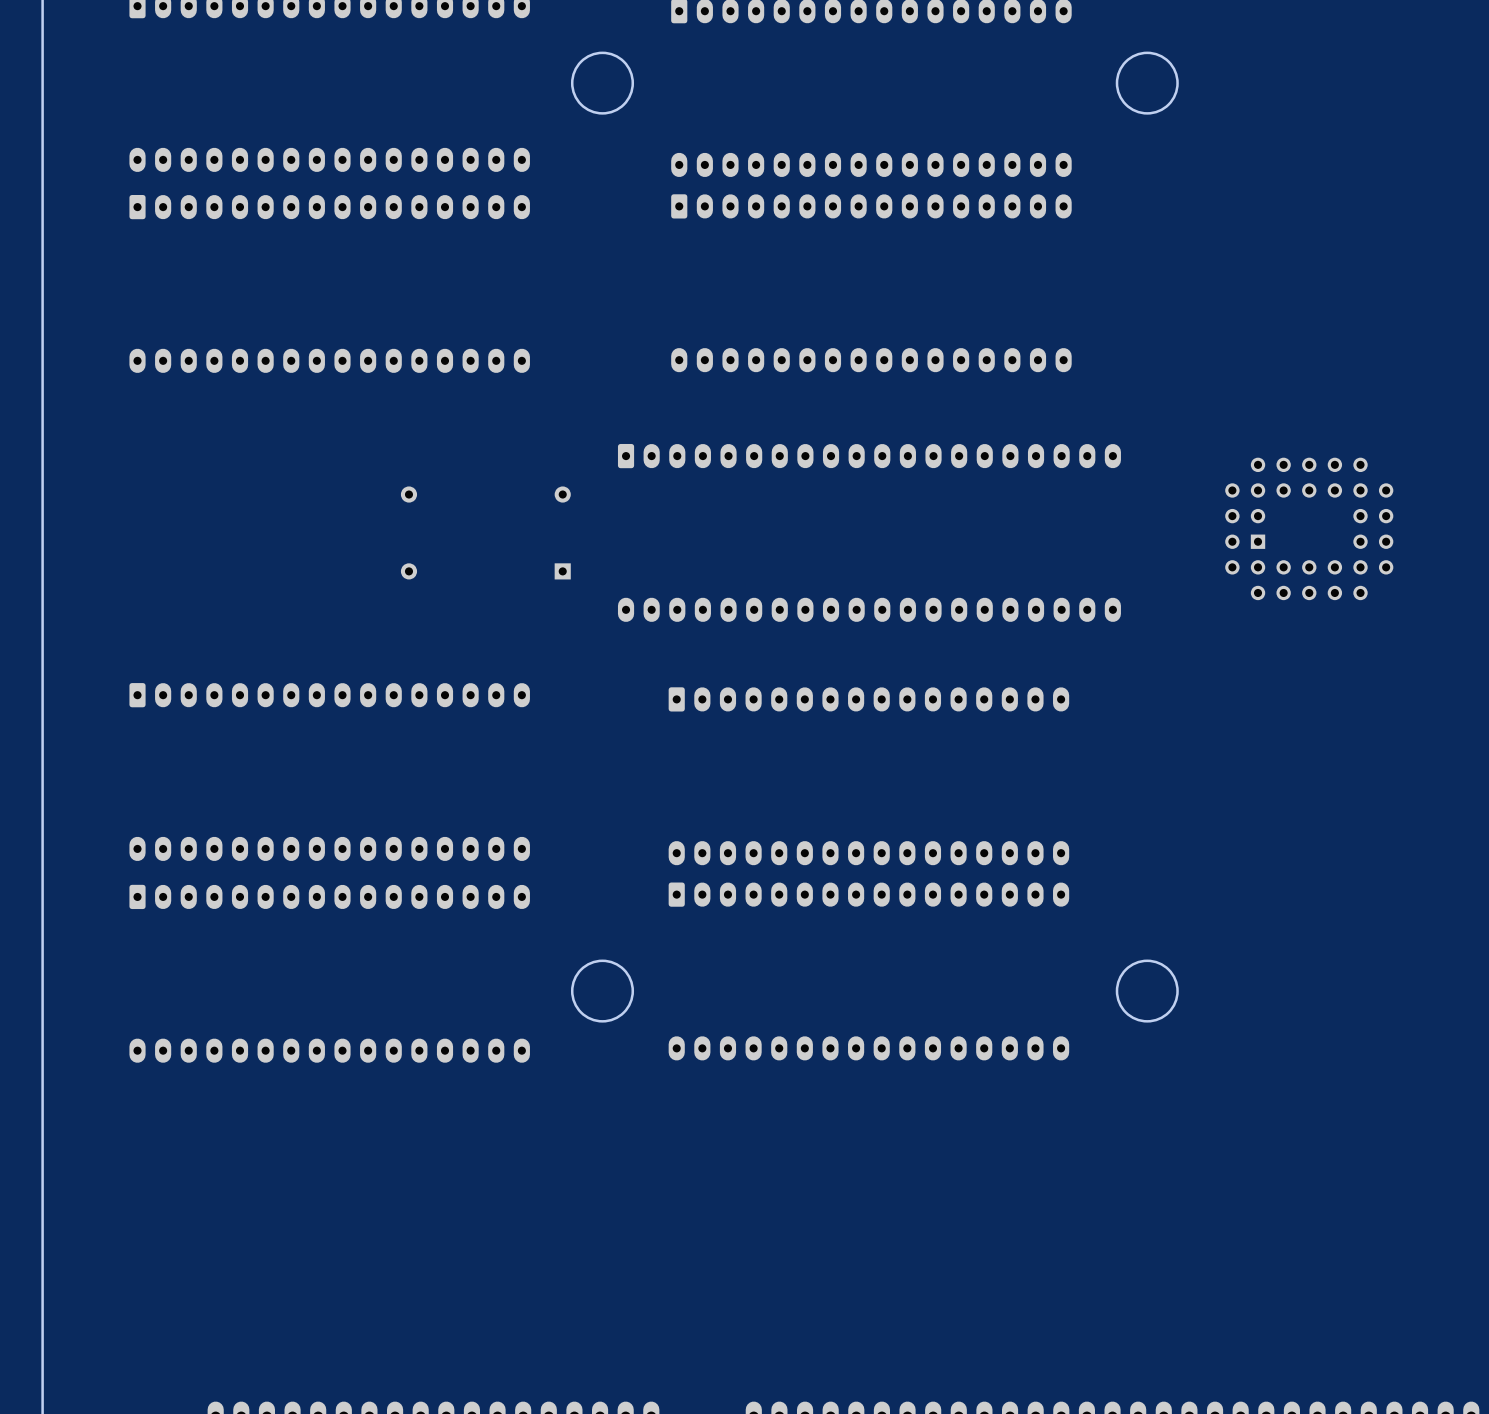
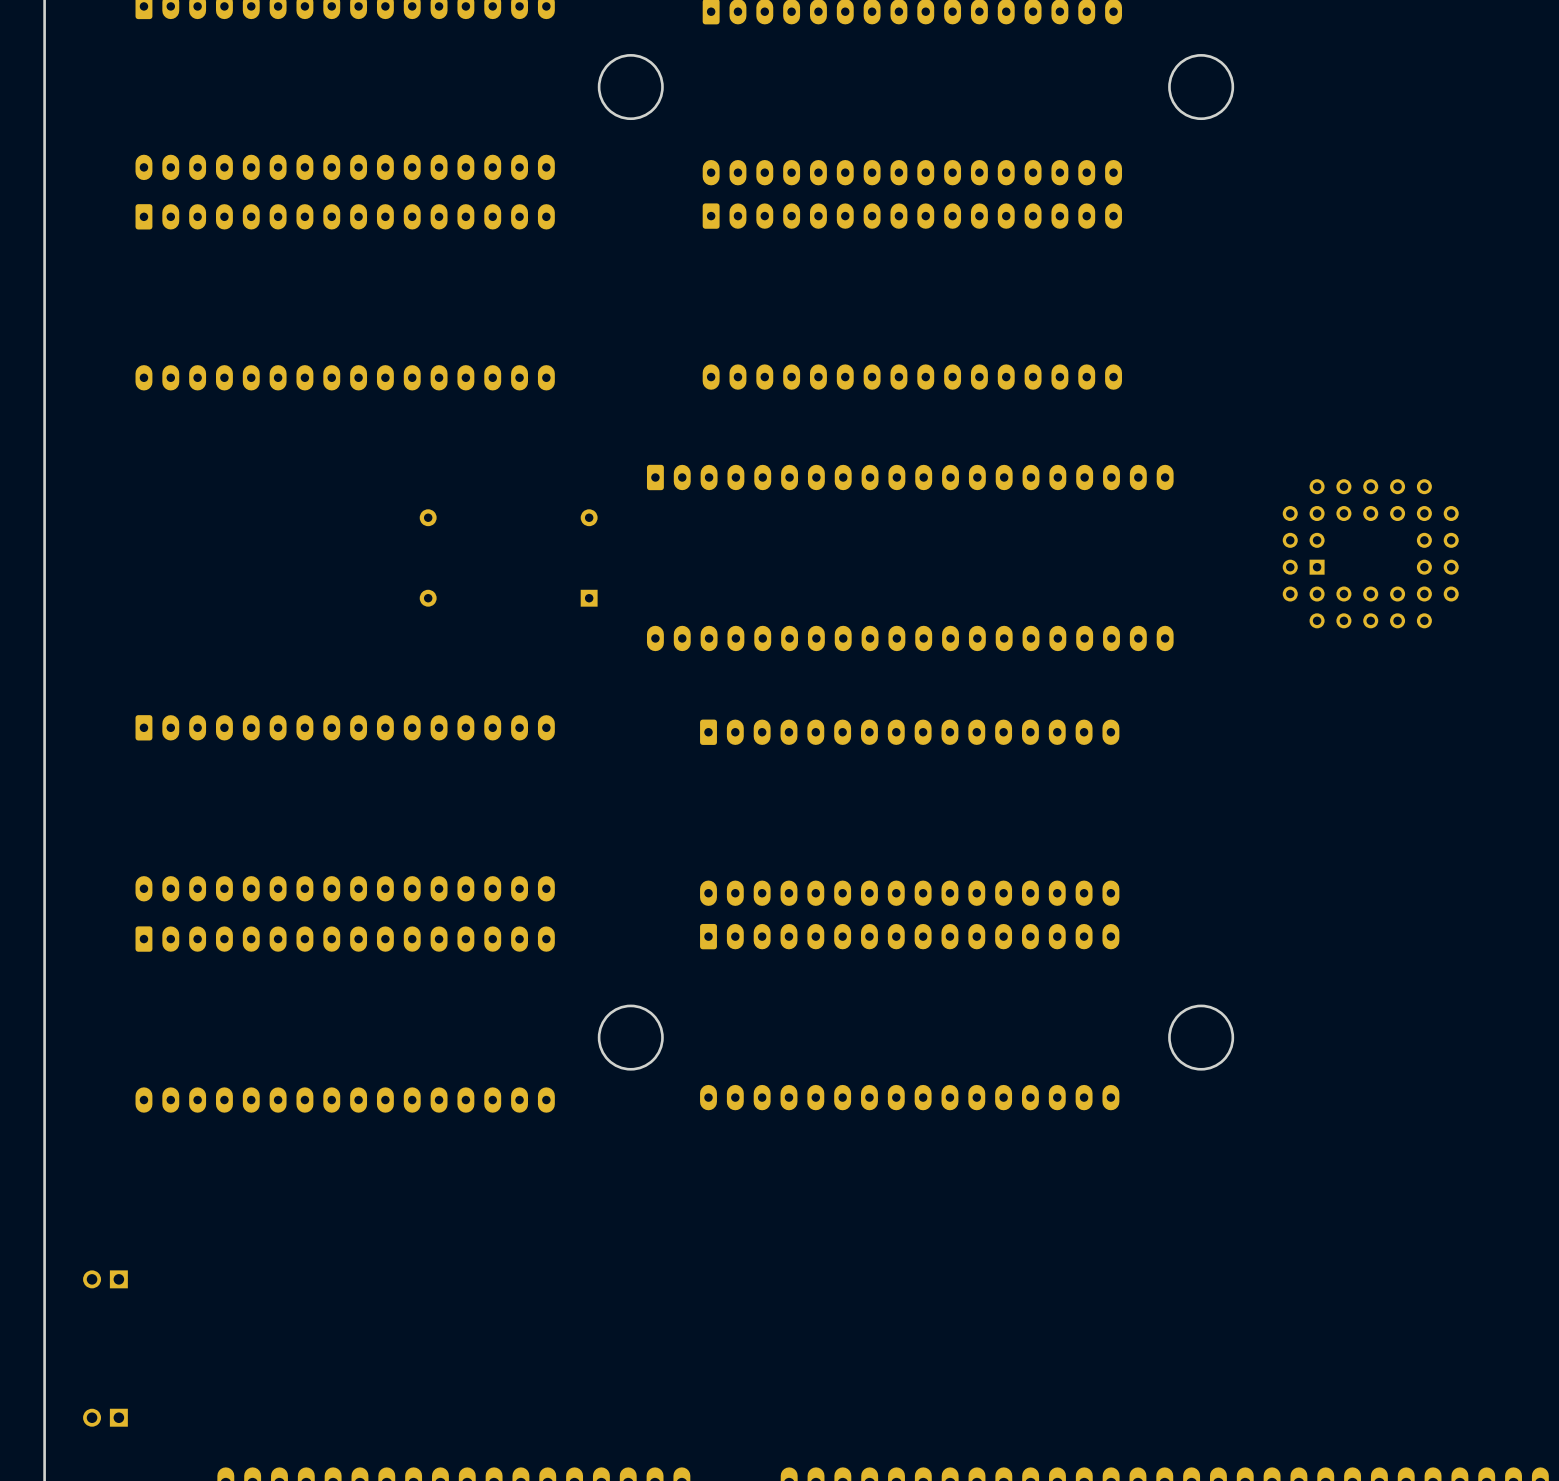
part: none -> (105, 1279)
part: none -> (105, 1417)

